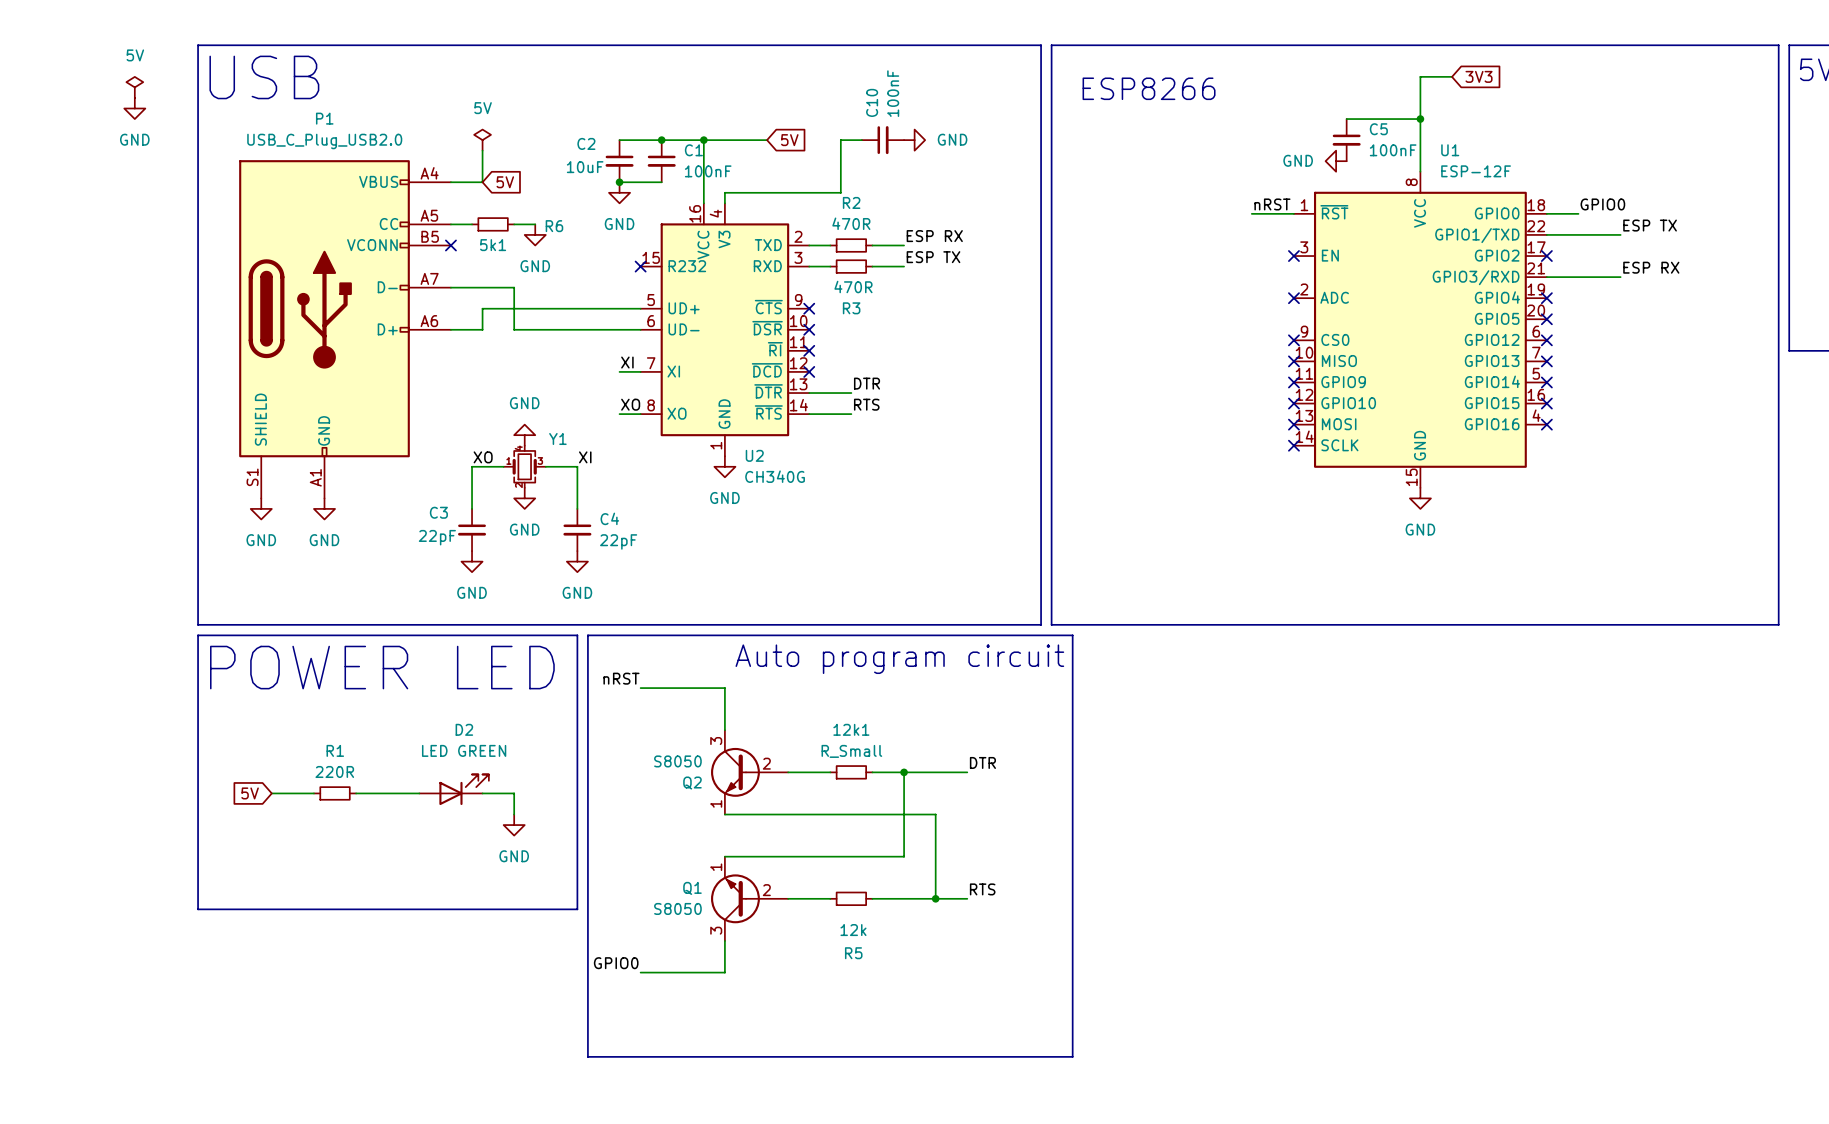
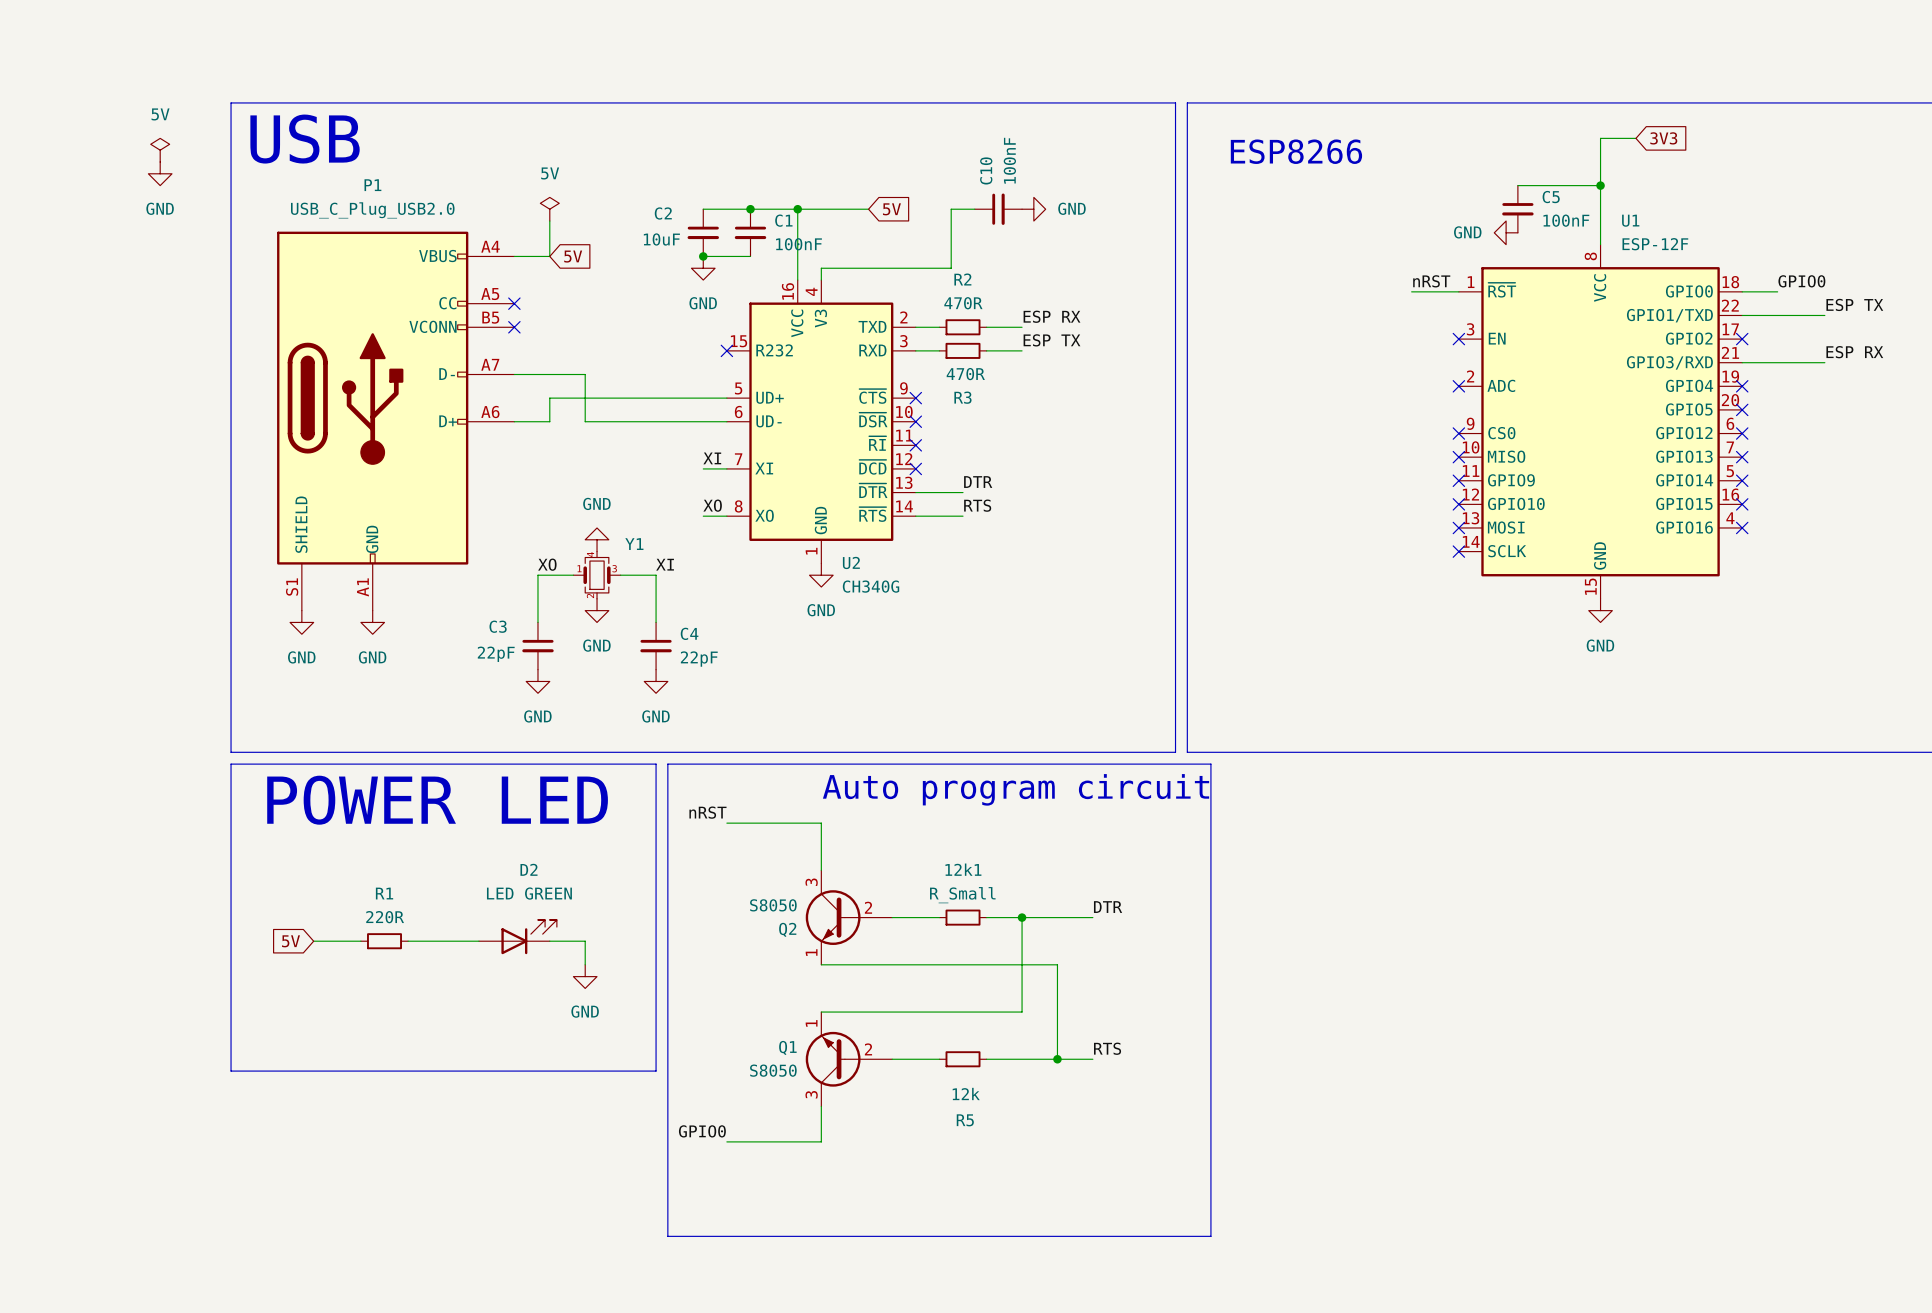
wire: (450, 224) (472, 224) -> none
no-connect mark: none -> (514, 303)
R6: 5k1 (493, 224) -> none
wire: (514, 224) (535, 224) -> none
power symbol: GND (535, 234) -> none

